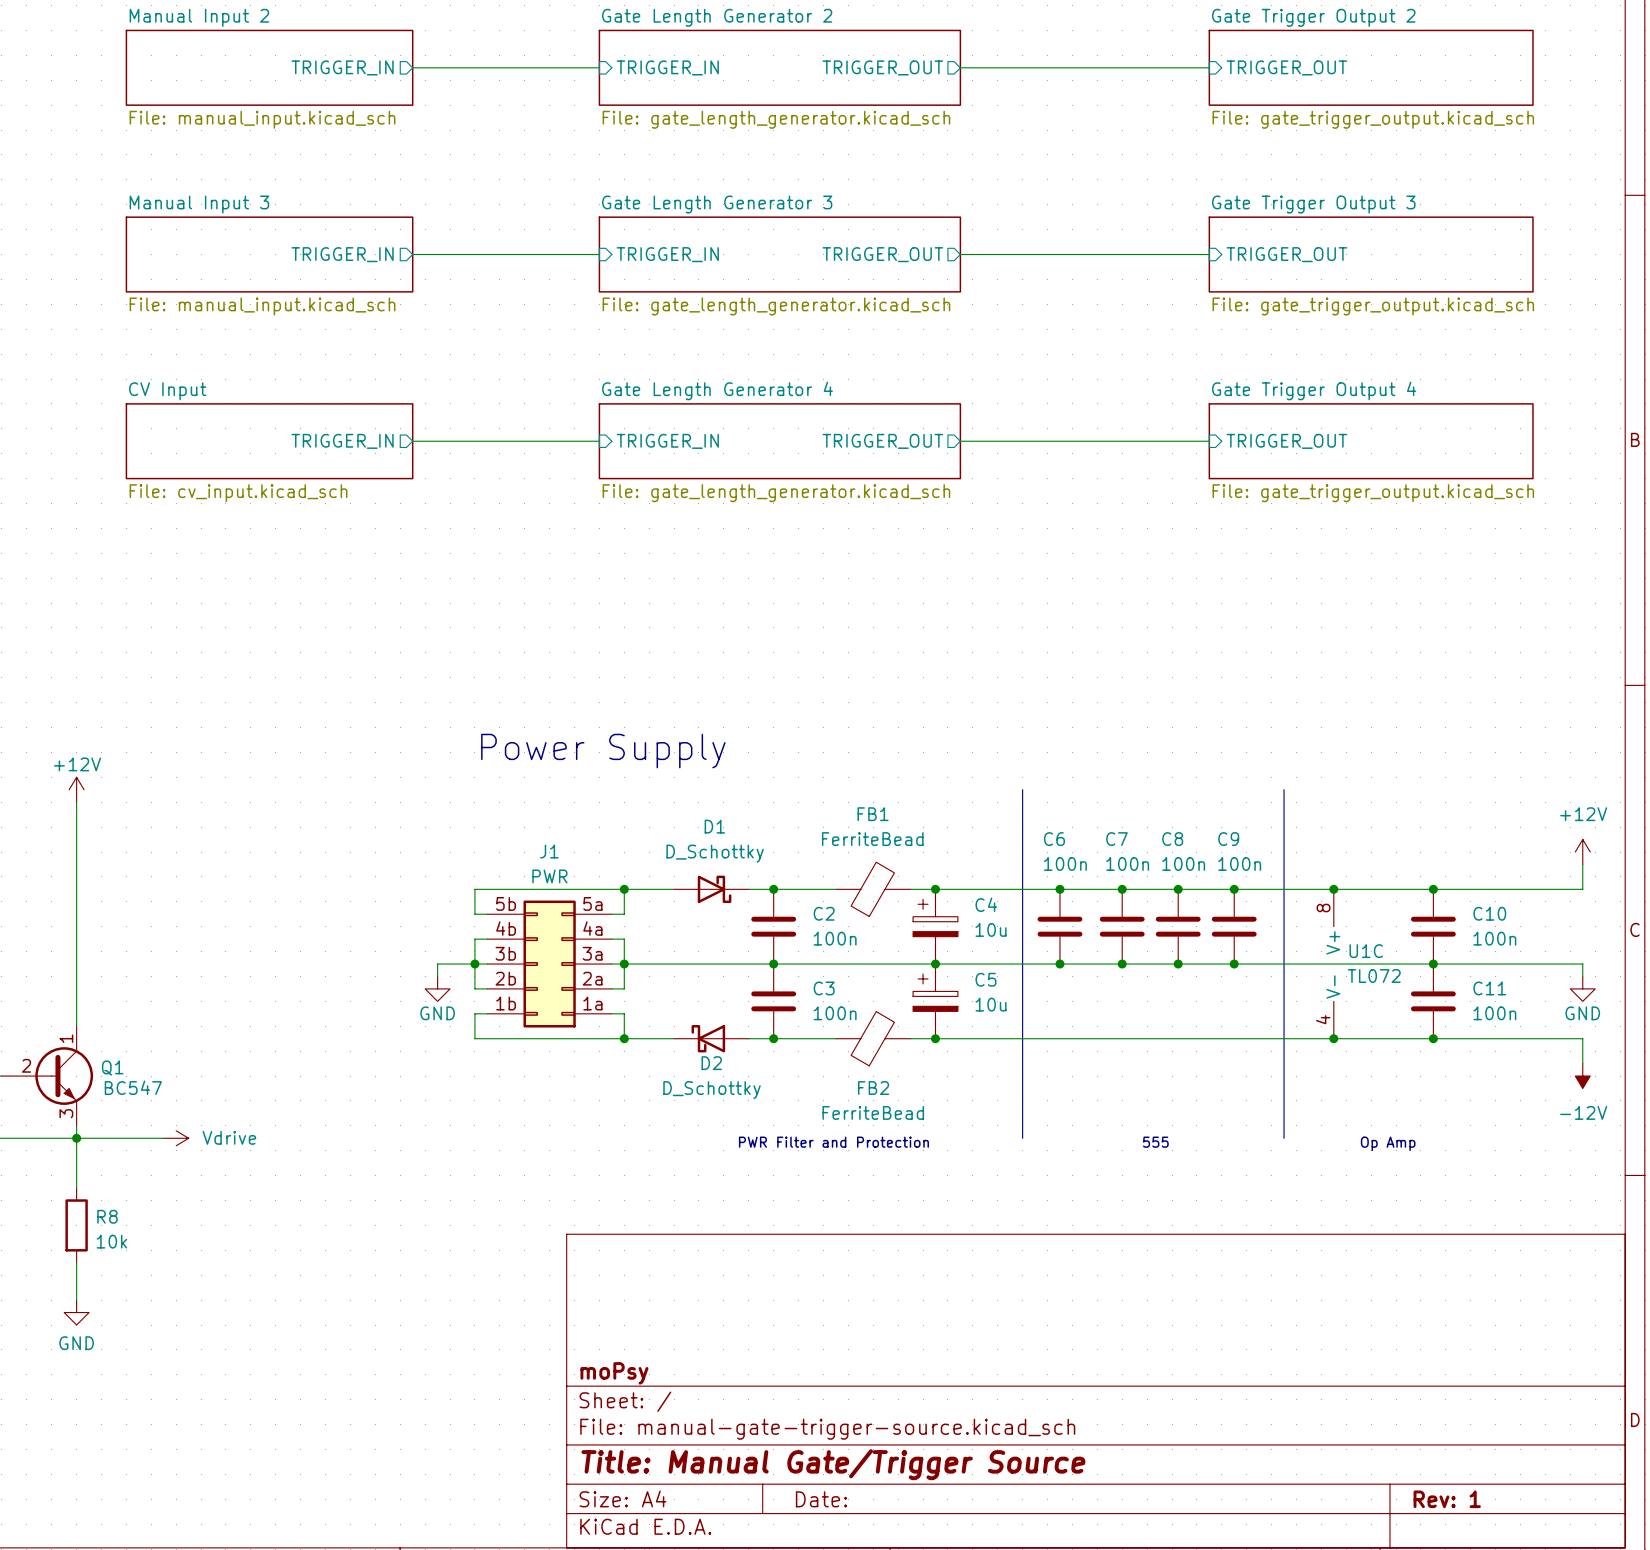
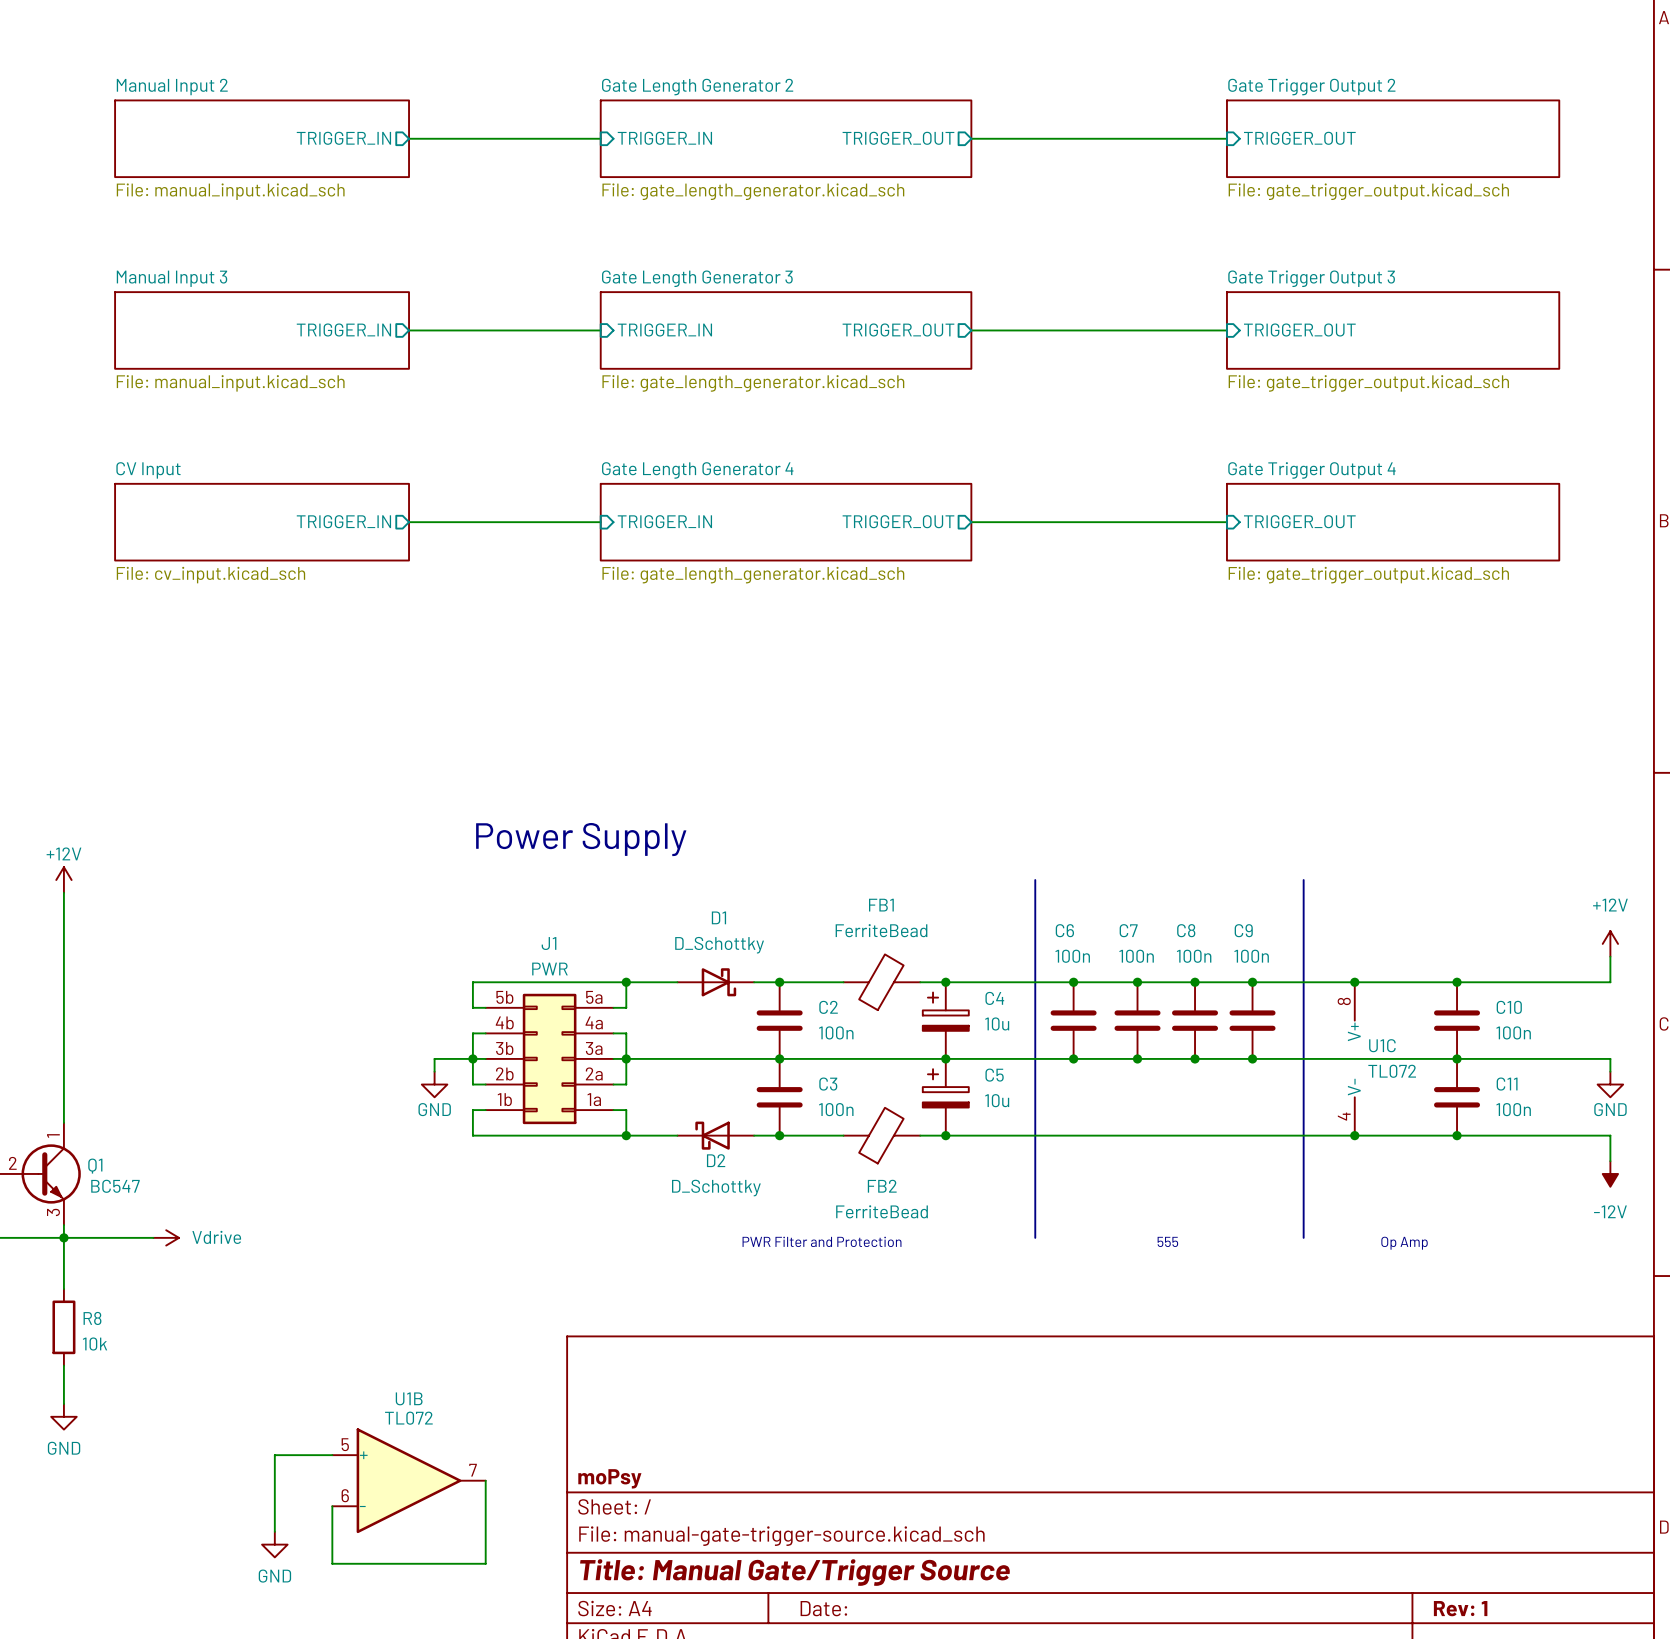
wire: none -> (332, 1455) (274, 1455) (274, 1531)
U1B: none -> TL072 (409, 1480)
wire: none -> (485, 1480) (485, 1563) (332, 1563) (332, 1506)
power symbol: none -> GND (274, 1544)

